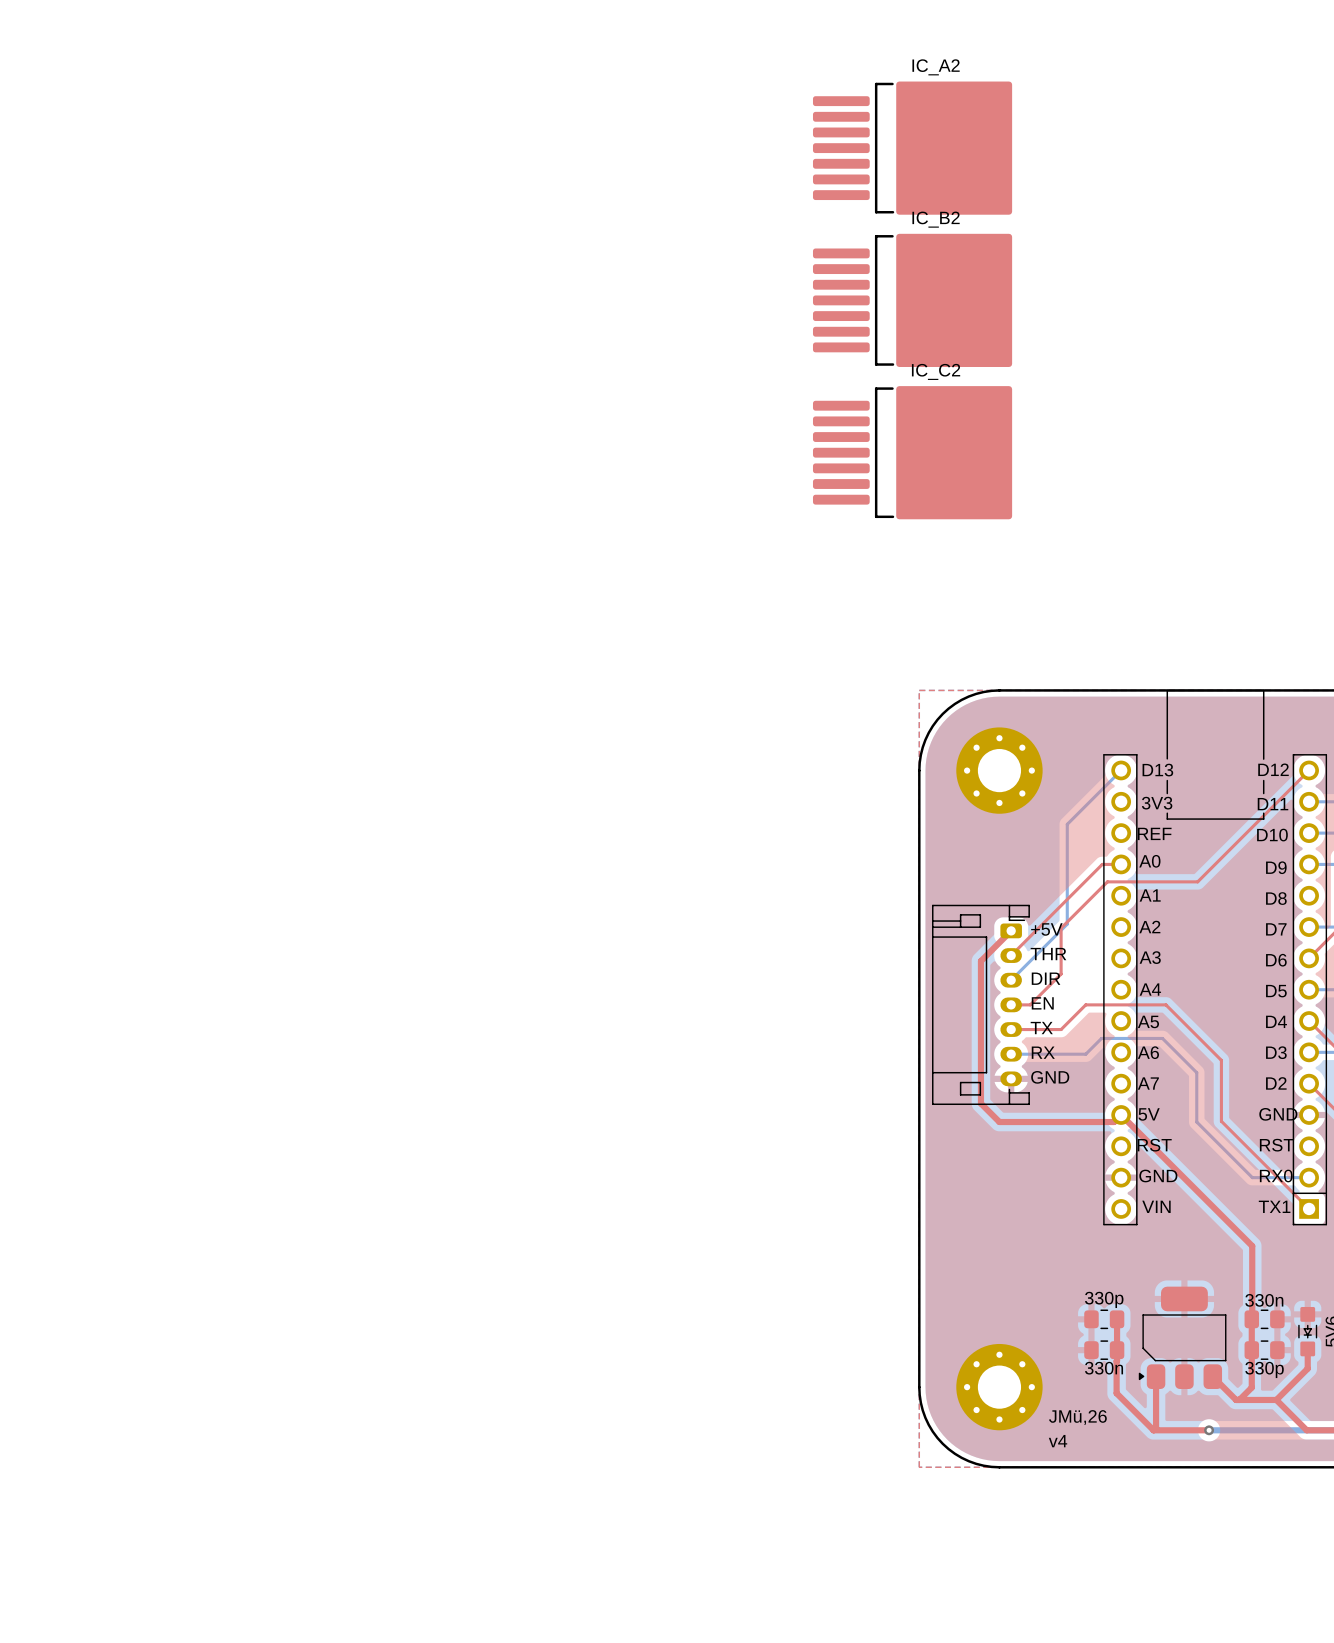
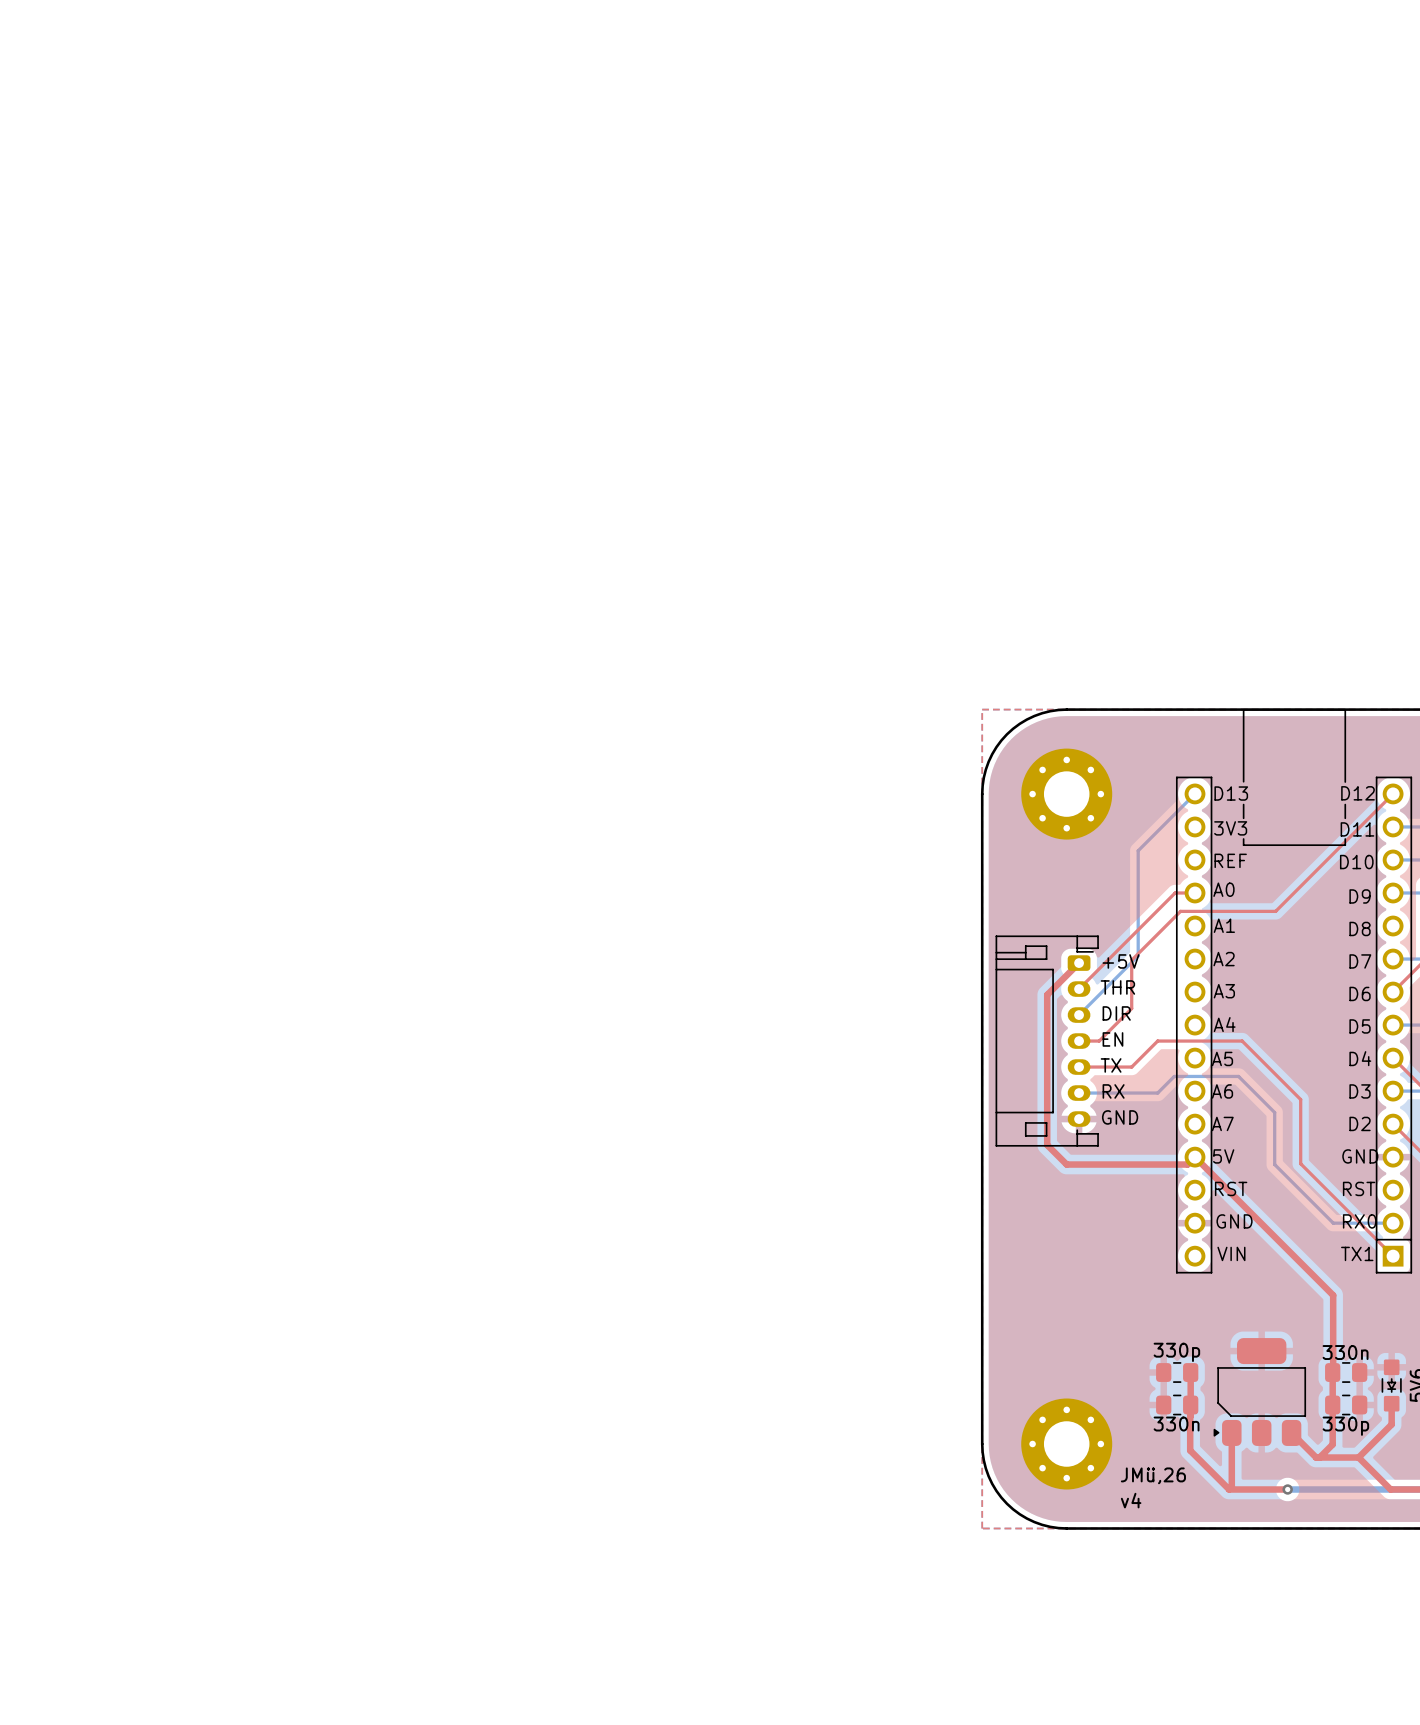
IC_A2: (912, 148) -> none
IC_B2: (912, 300) -> none
IC_C2: (912, 452) -> none

